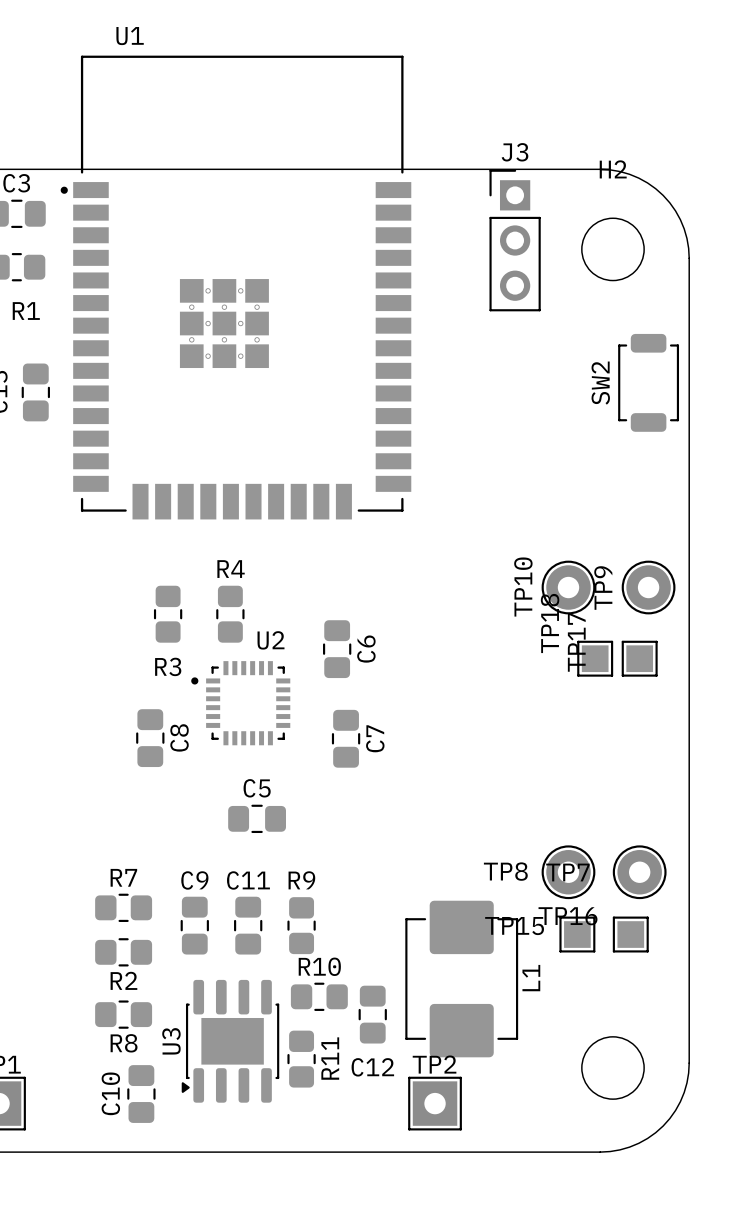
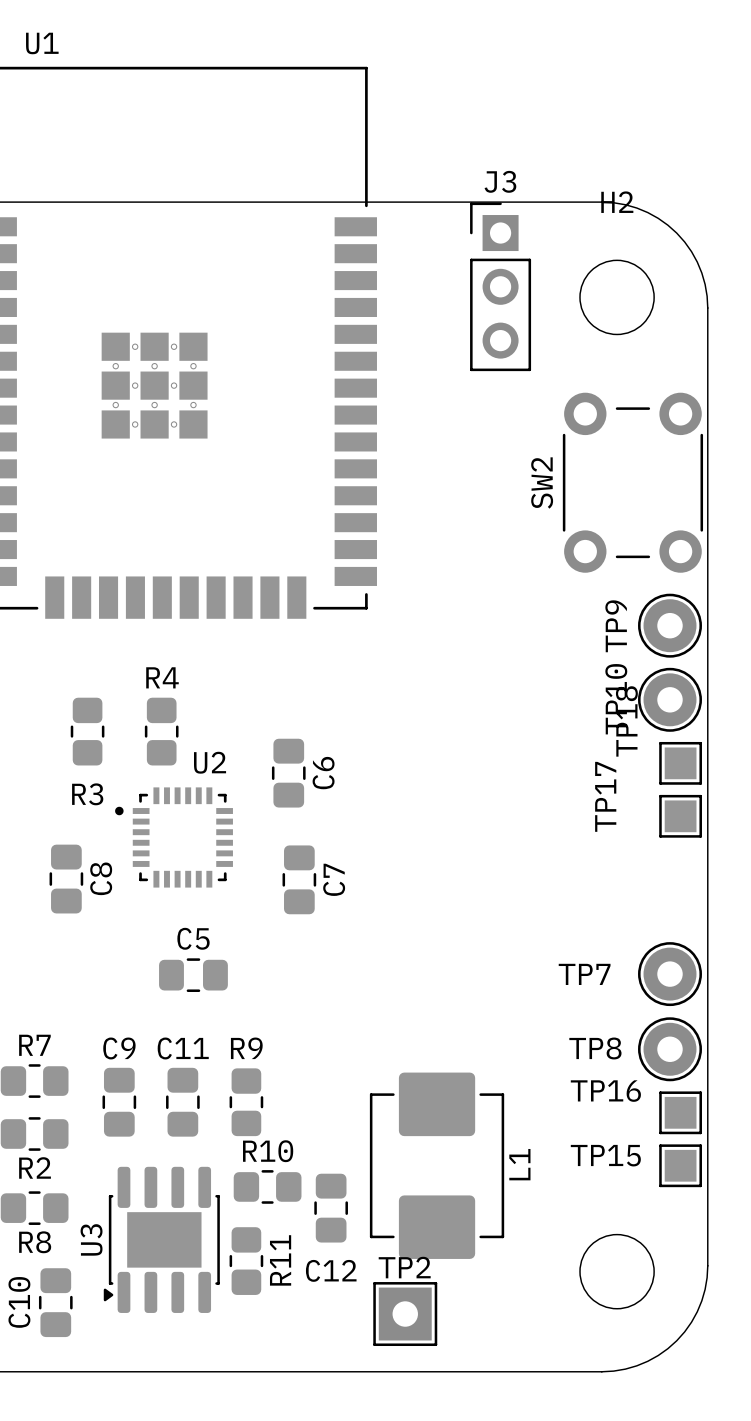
SW2 footprint: [618, 333, 680, 432] -> [562, 392, 704, 573]
TP10 position: (568, 587) -> (670, 699)
TP9 position: (648, 587) -> (670, 625)
TP18 position: (595, 658) -> (680, 763)
TP17 position: (639, 658) -> (680, 816)
TP8 position: (568, 872) -> (670, 1049)
TP7 position: (639, 872) -> (670, 974)
TP15 position: (577, 934) -> (680, 1165)
TP16 position: (630, 934) -> (680, 1112)

